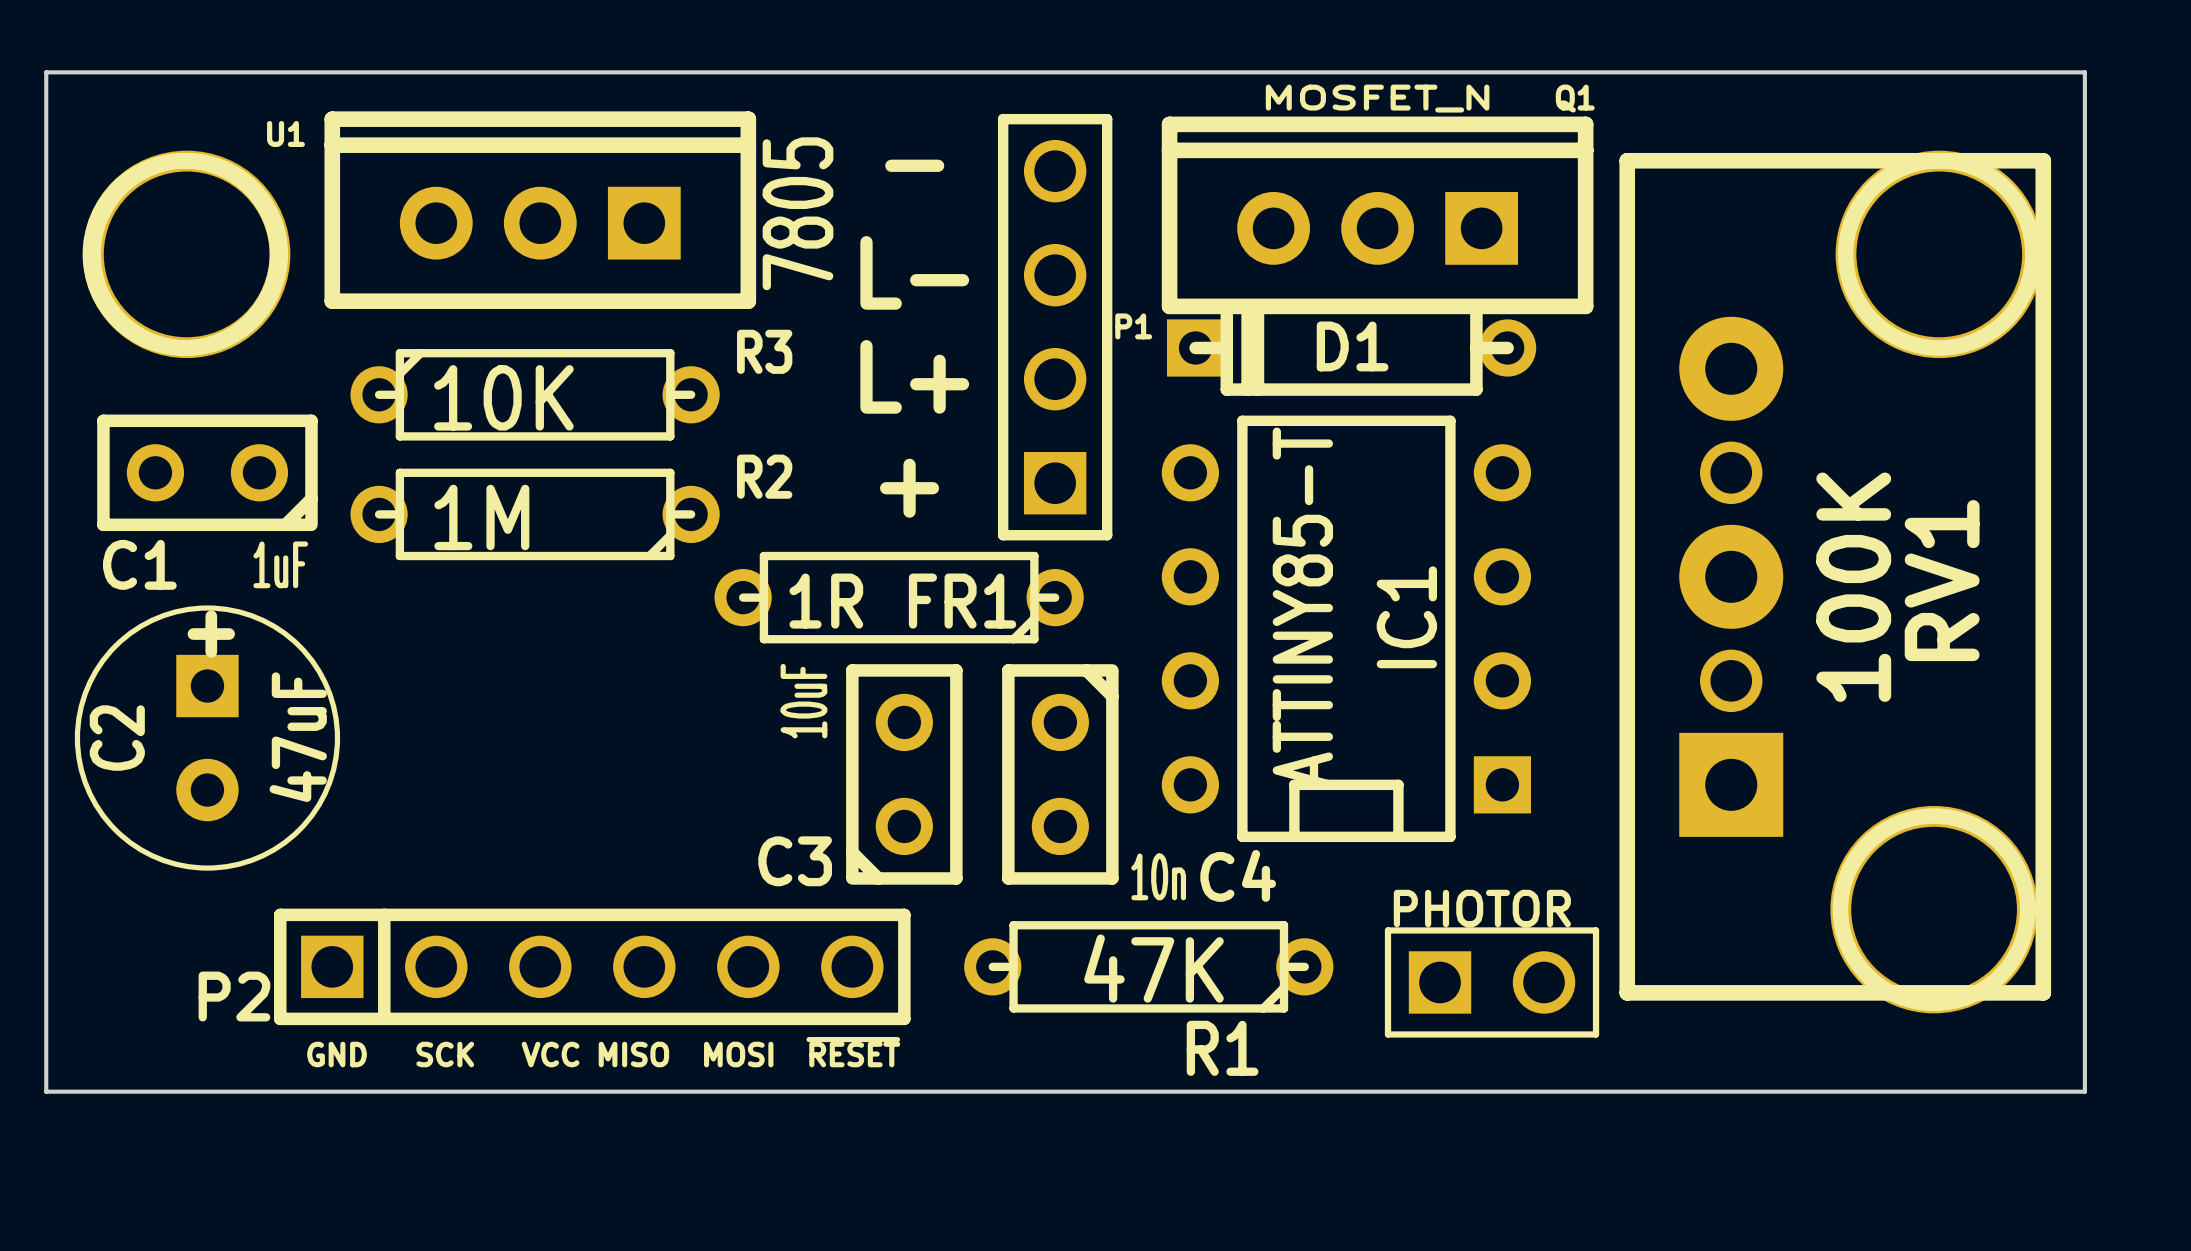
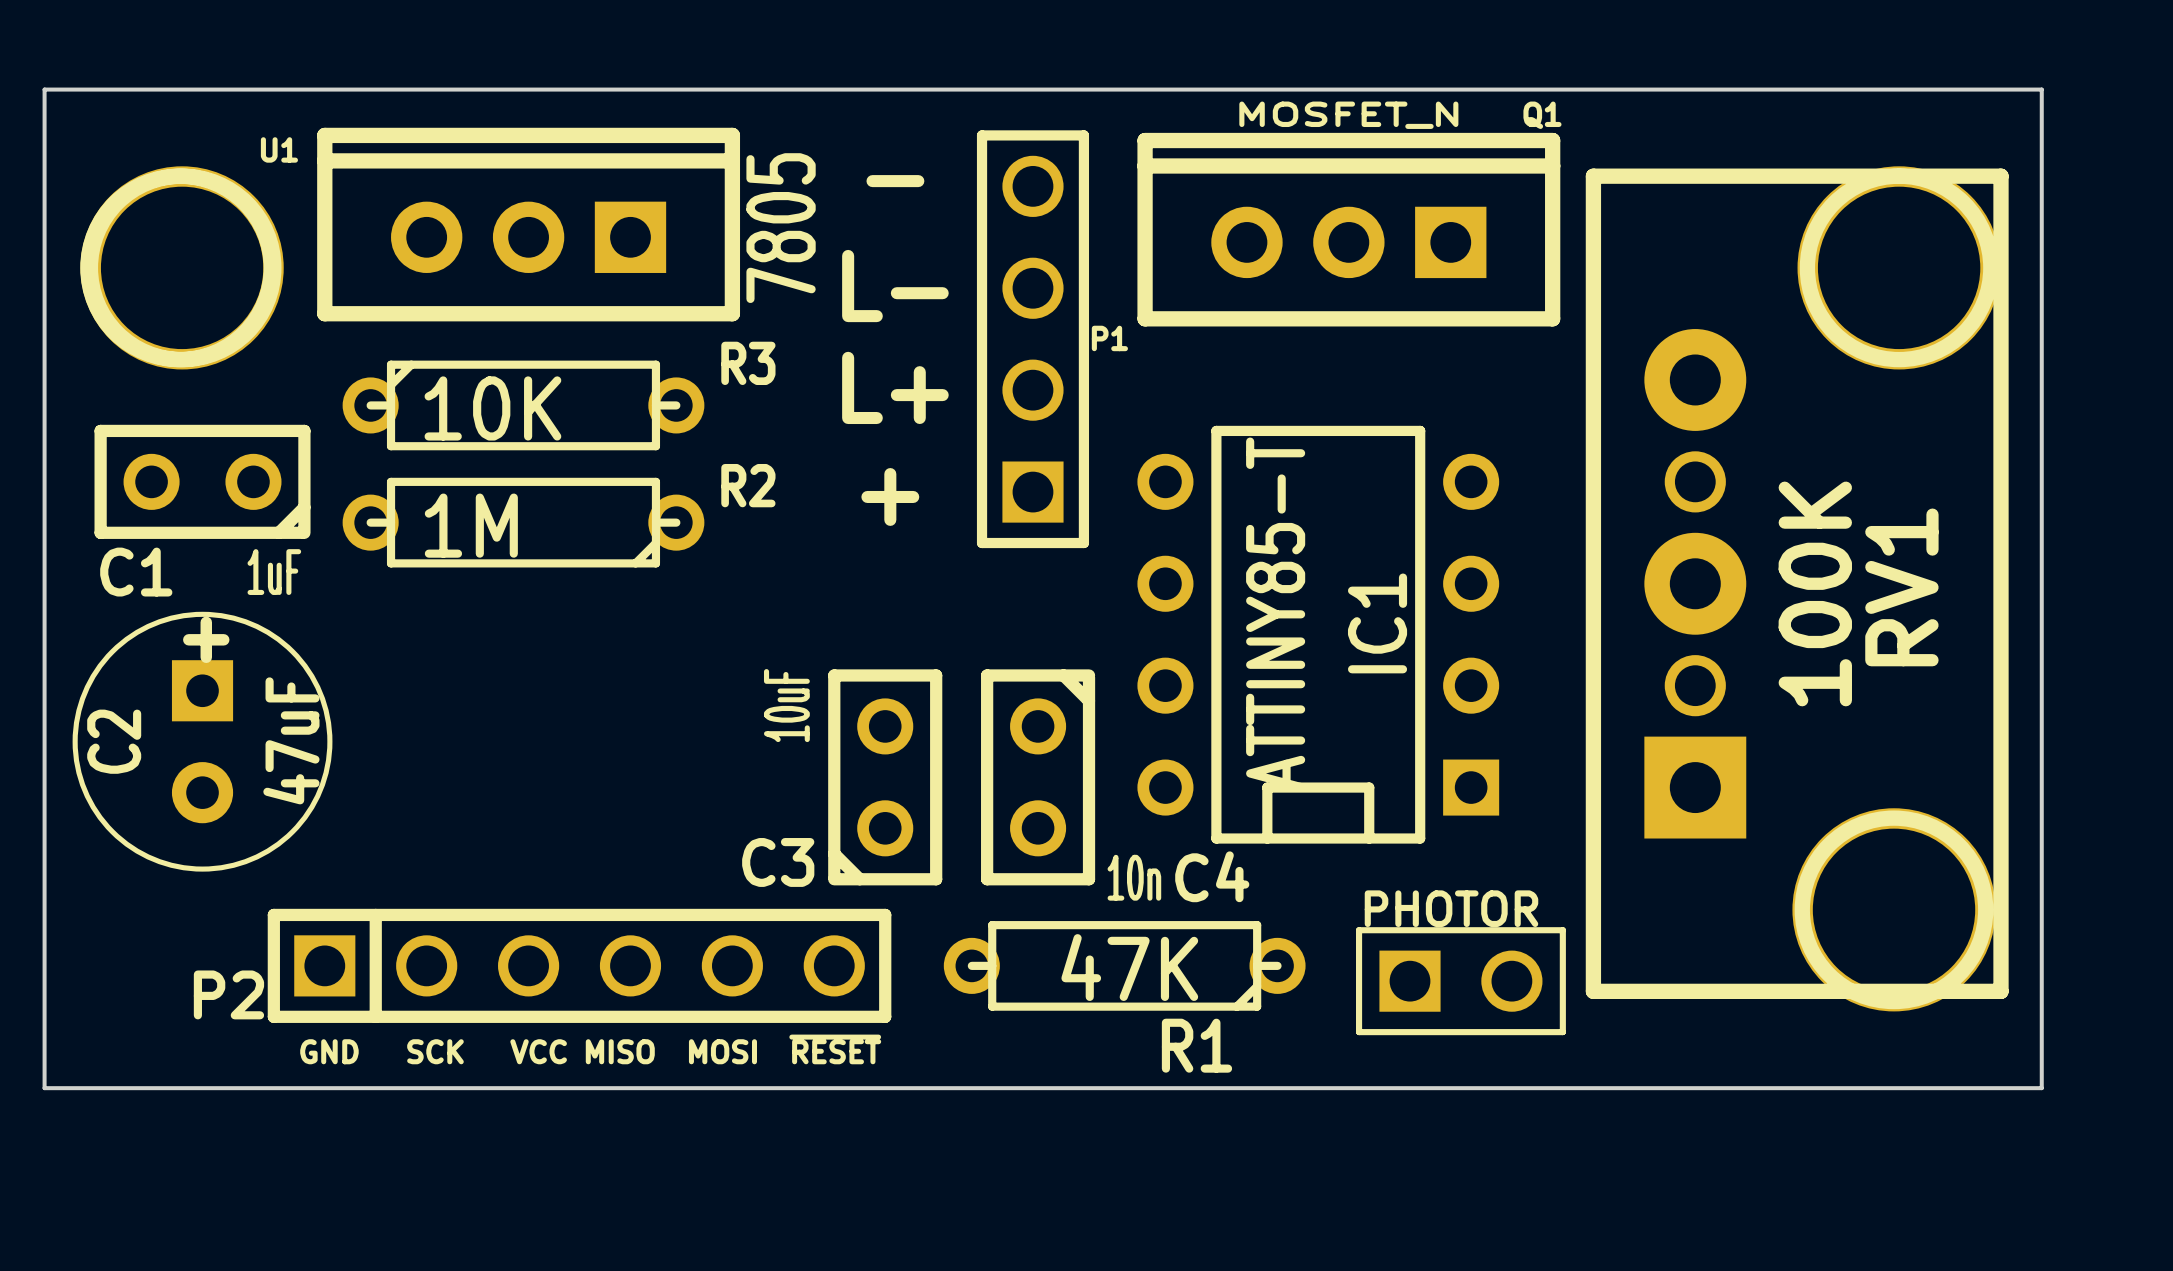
D1: (1351, 347) -> none
FR1: 1R (899, 597) -> none

